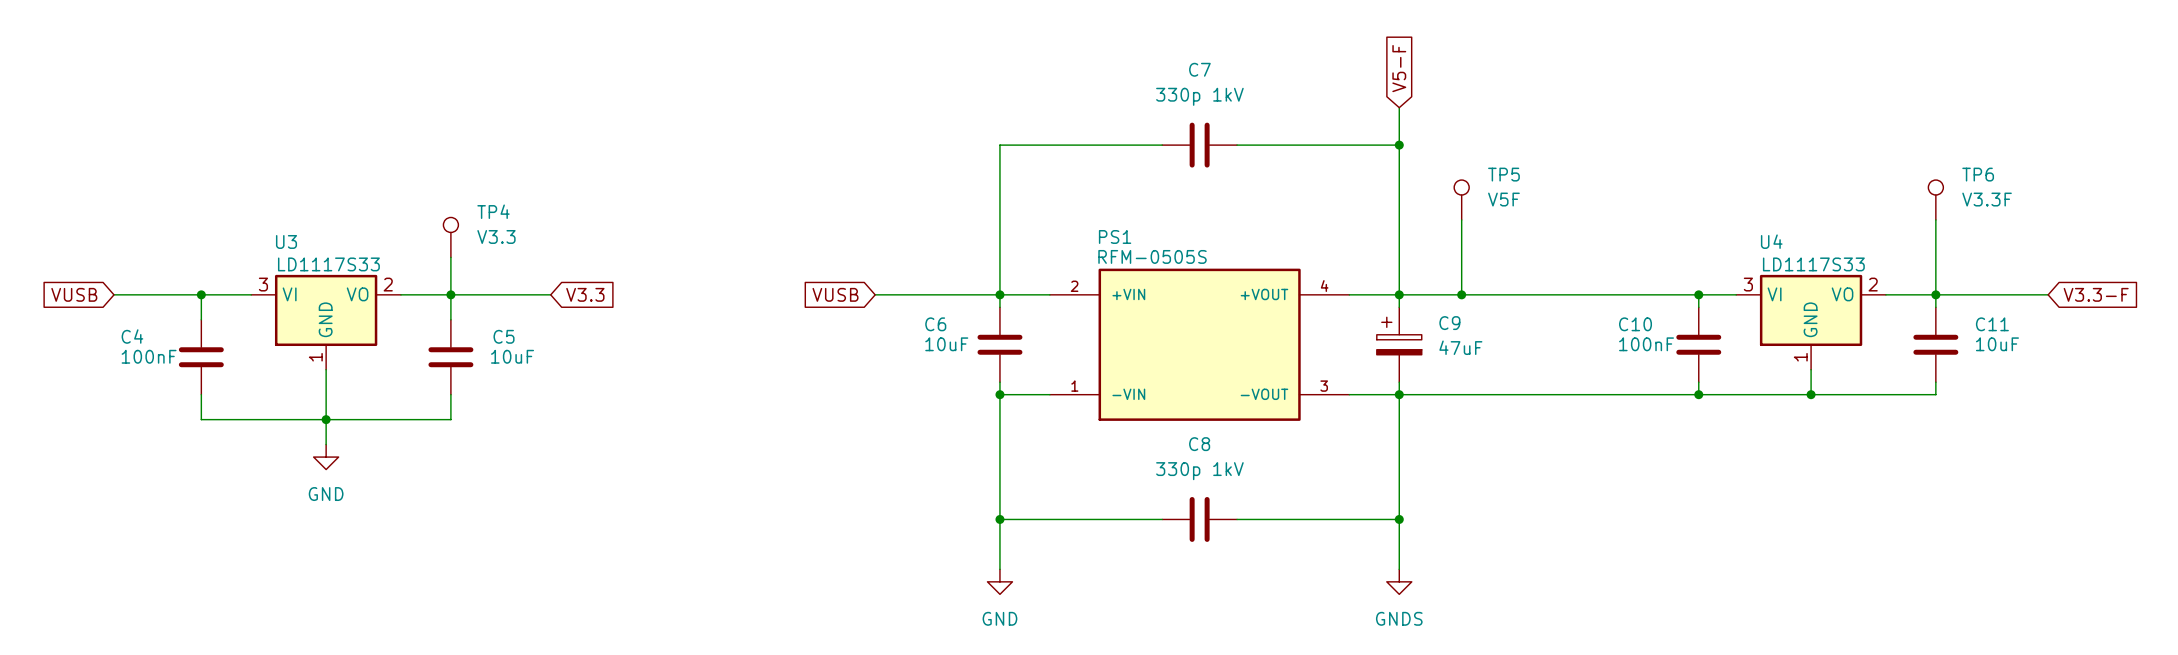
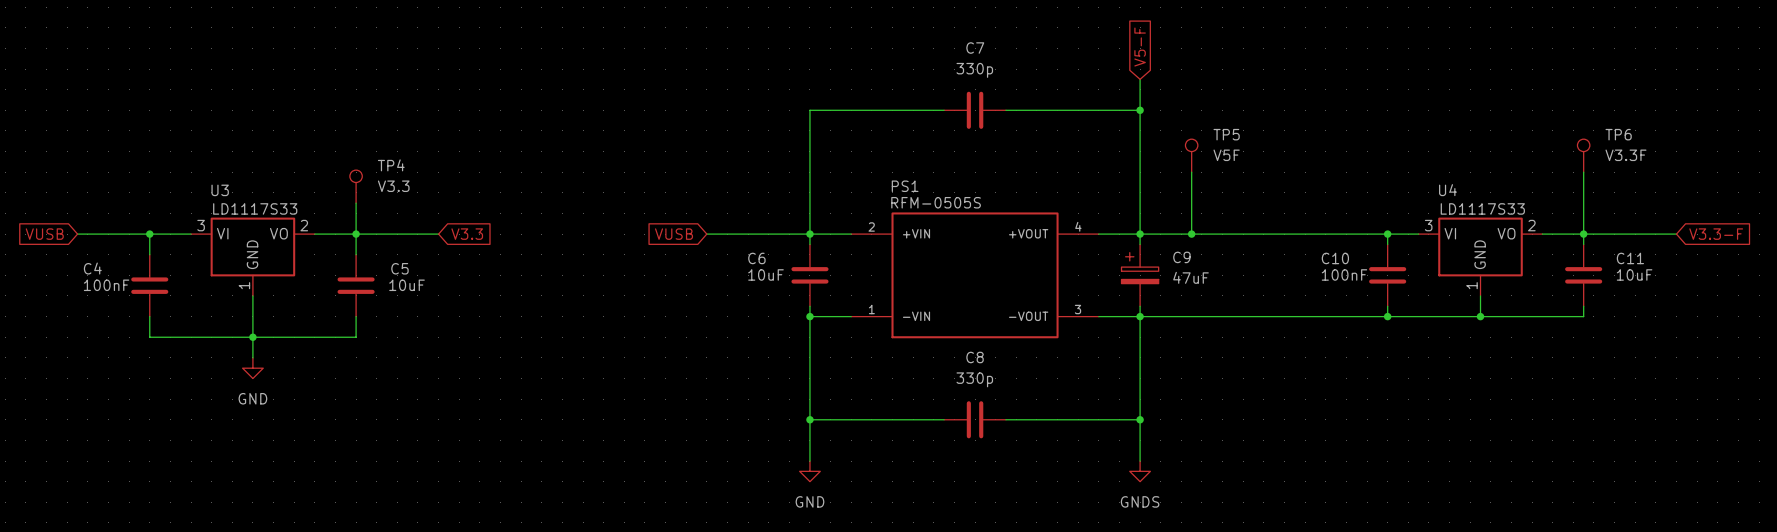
C7 value: 330p 1kV (1199, 96) -> 330p (974, 70)
C8 value: 330p 1kV (1199, 471) -> 330p (974, 379)

